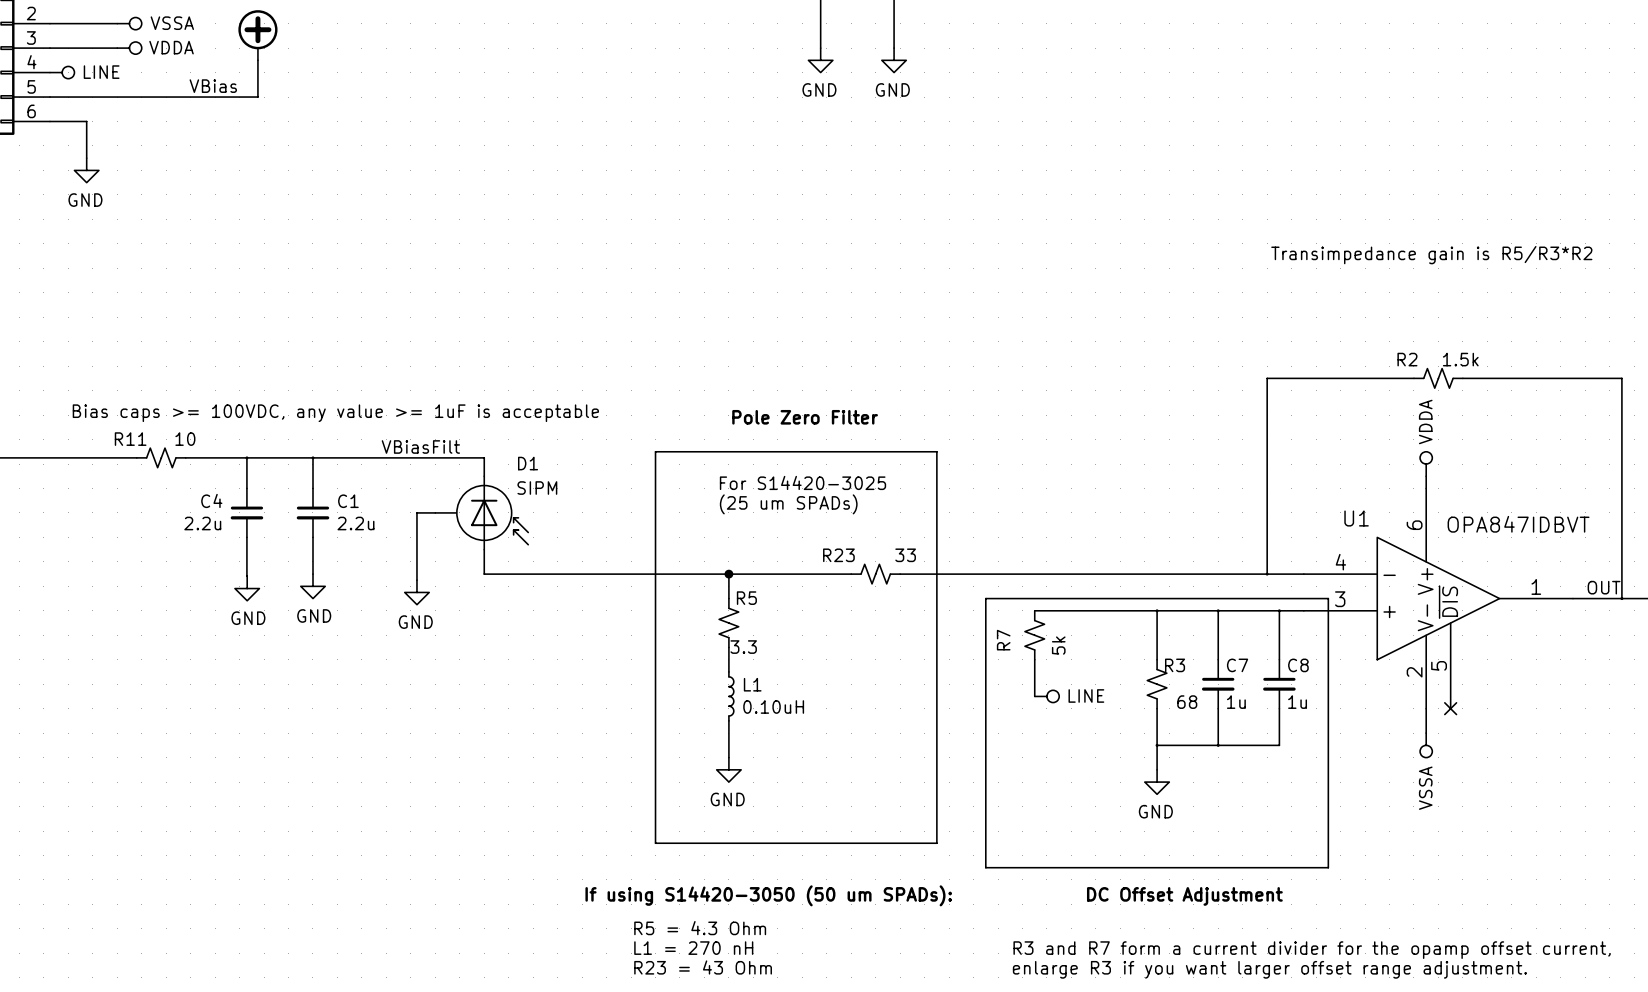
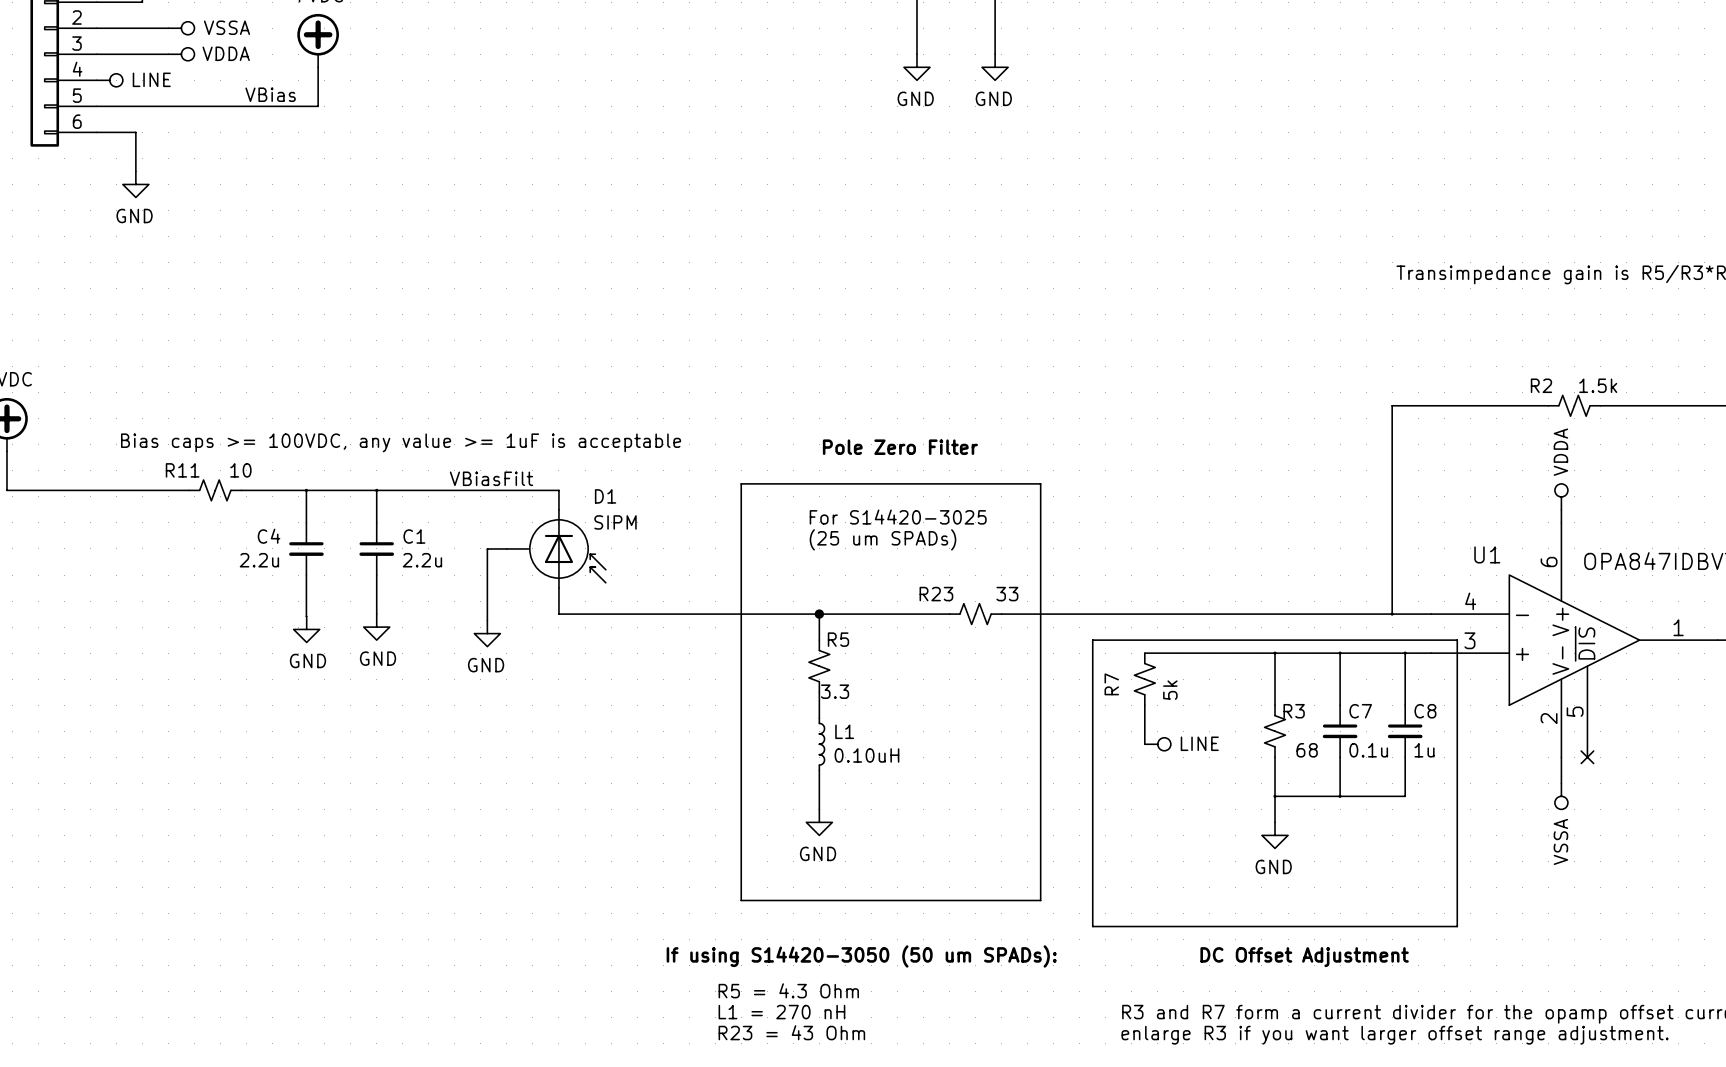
C7 value: 1u (1236, 702) -> 0.1u (1368, 750)

